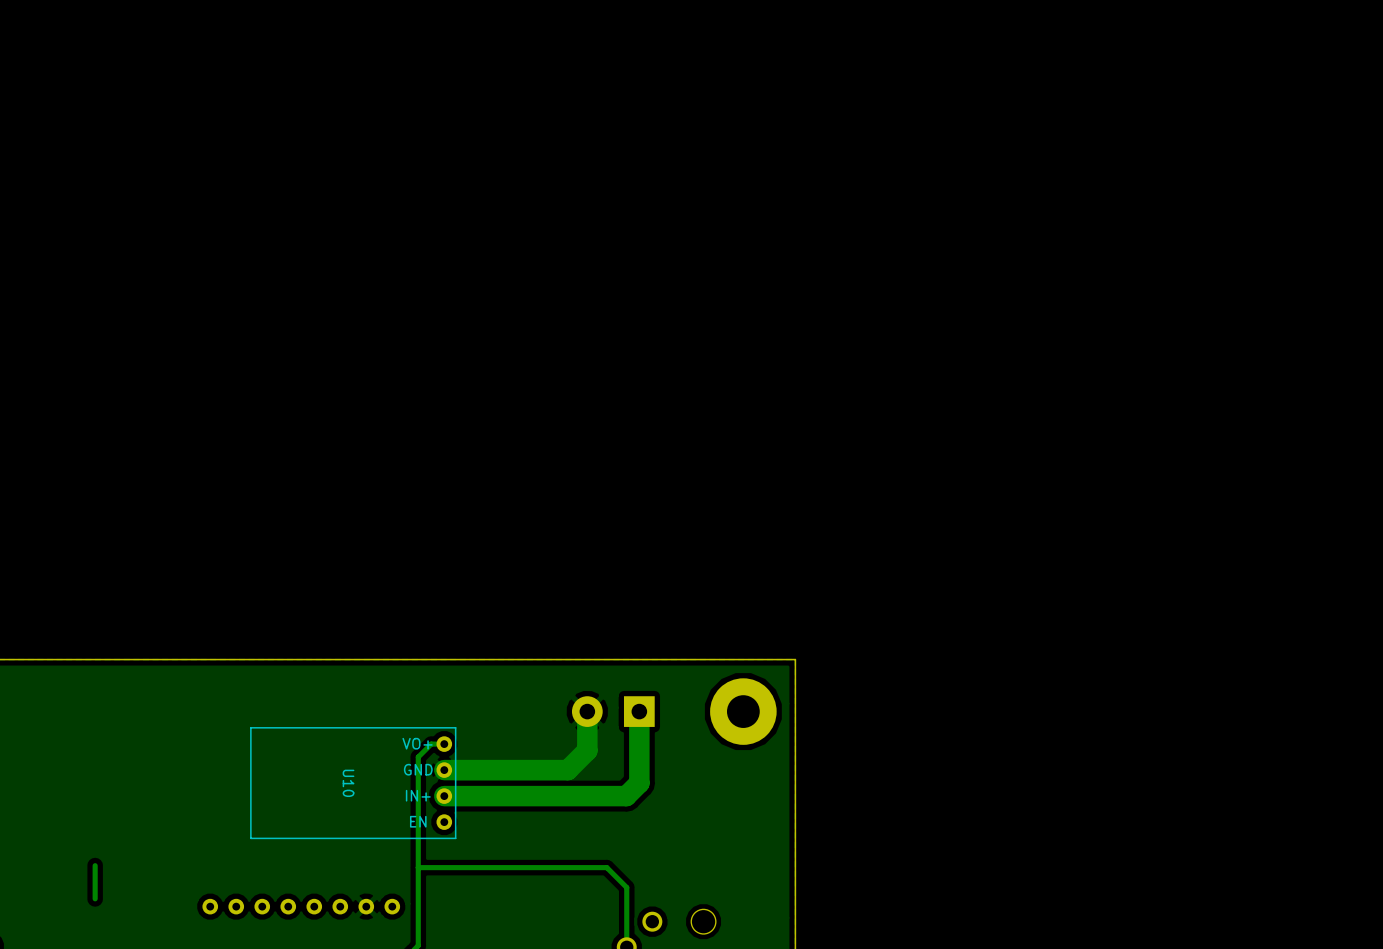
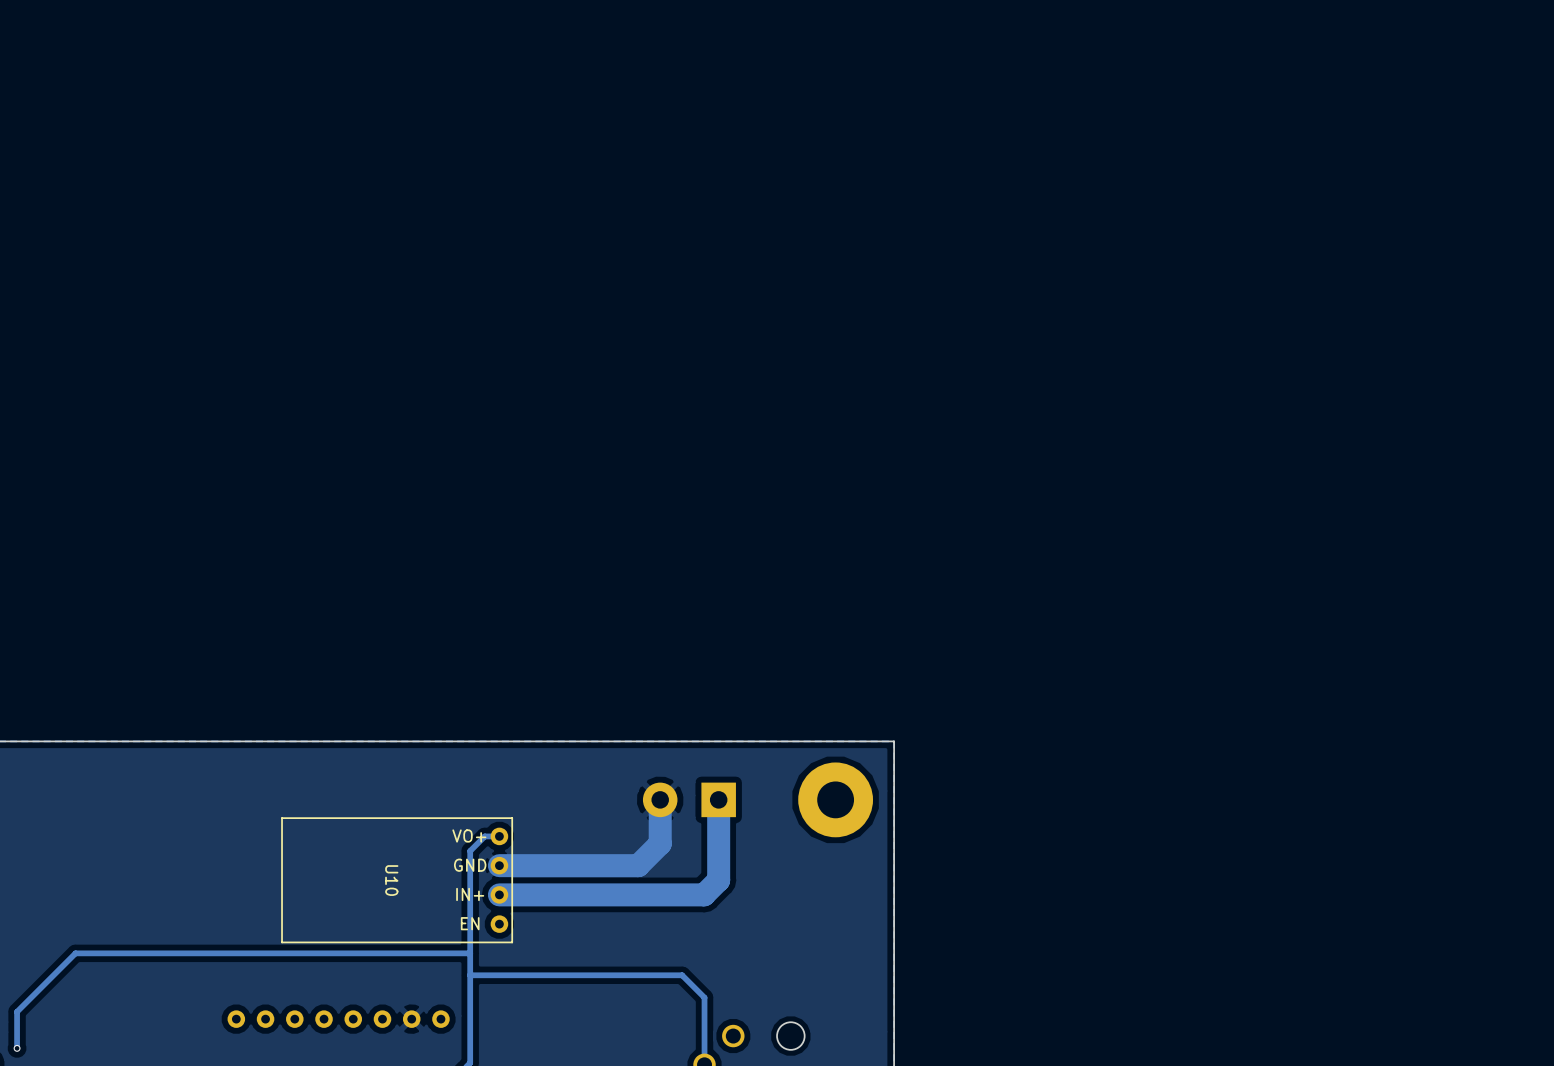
track: none -> (470, 953) (75, 953) (17, 1011) (17, 1048)
track: (95, 865) (95, 898) -> none
via: none -> (17, 1048)

